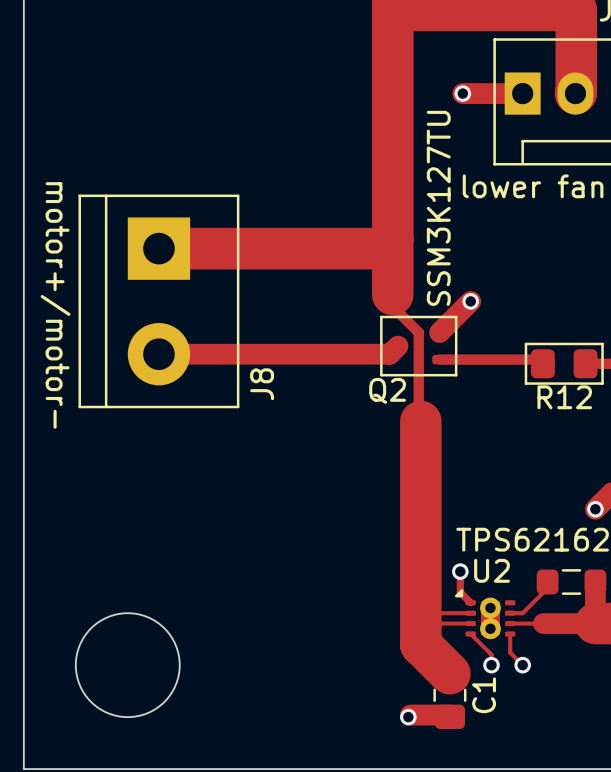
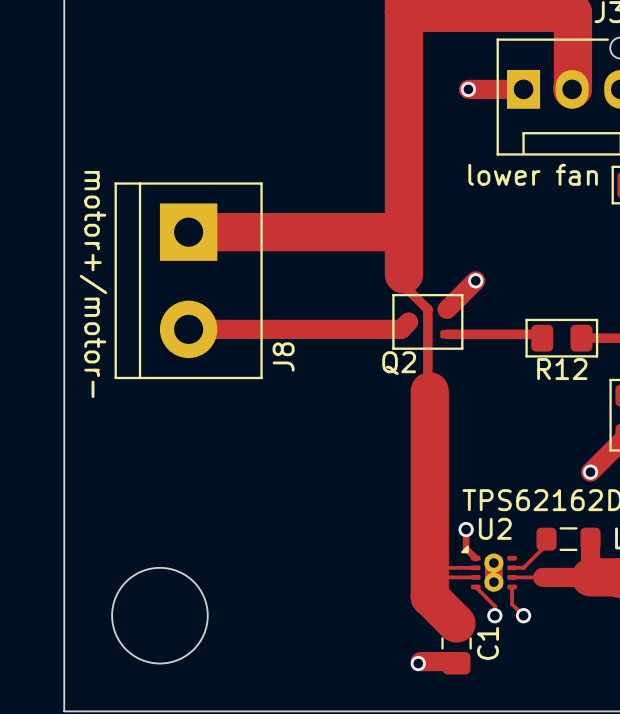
Q2 value: SSM3K127TU (438, 208) -> none

